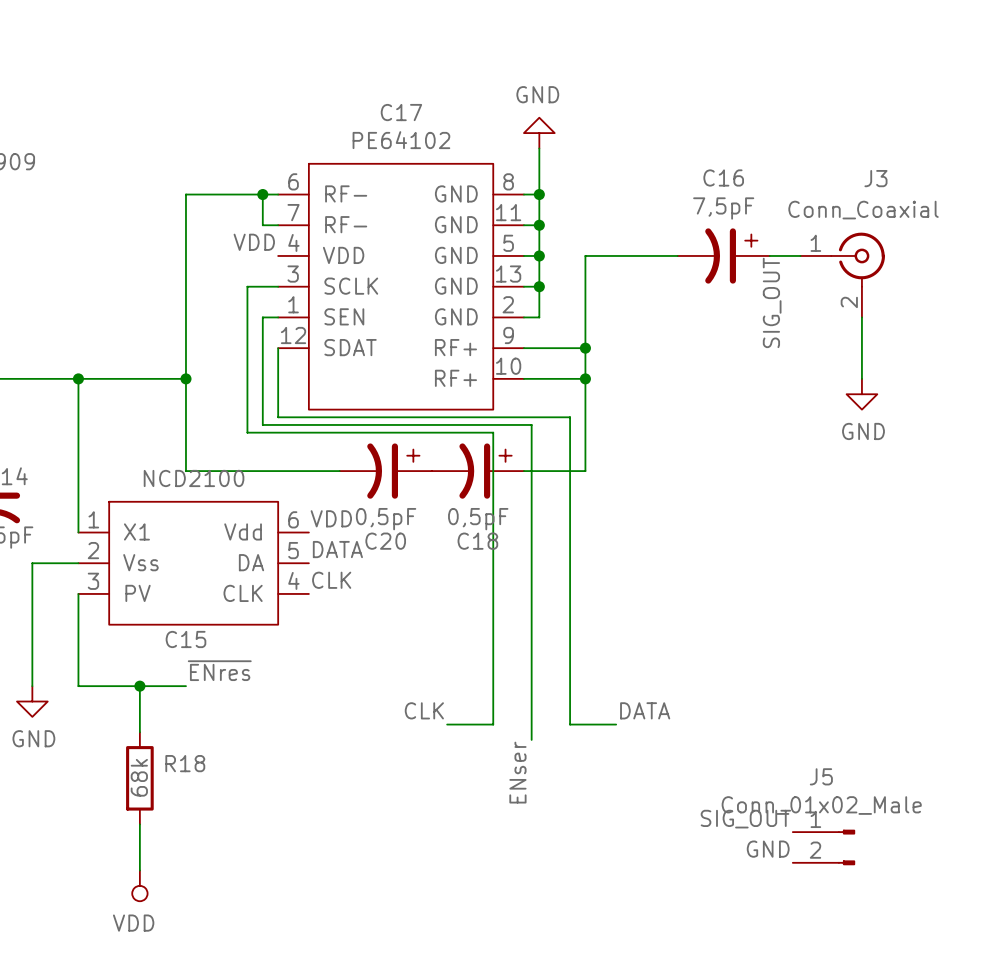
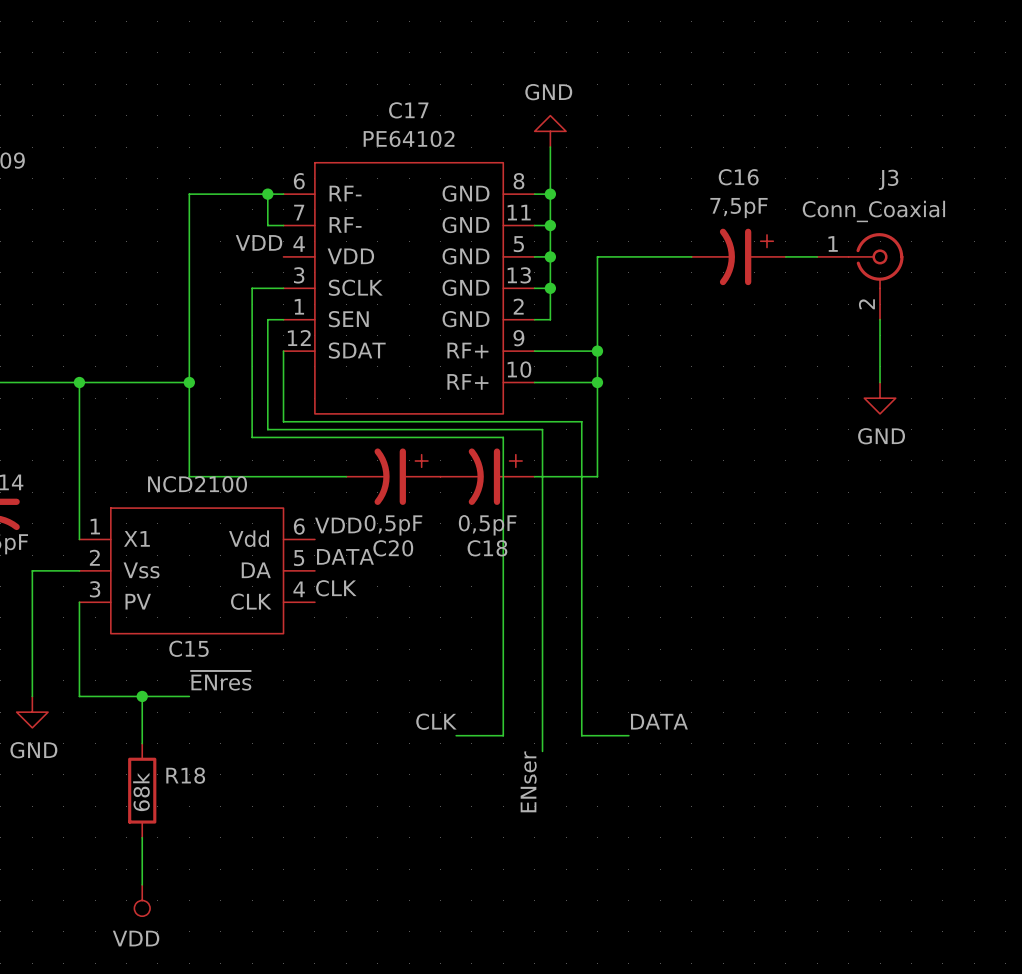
label: SIG_OUT (772, 302) -> none
label: SIG_OUT (745, 819) -> none
J5: Conn_01x02_Male (824, 847) -> none
label: GND (768, 849) -> none

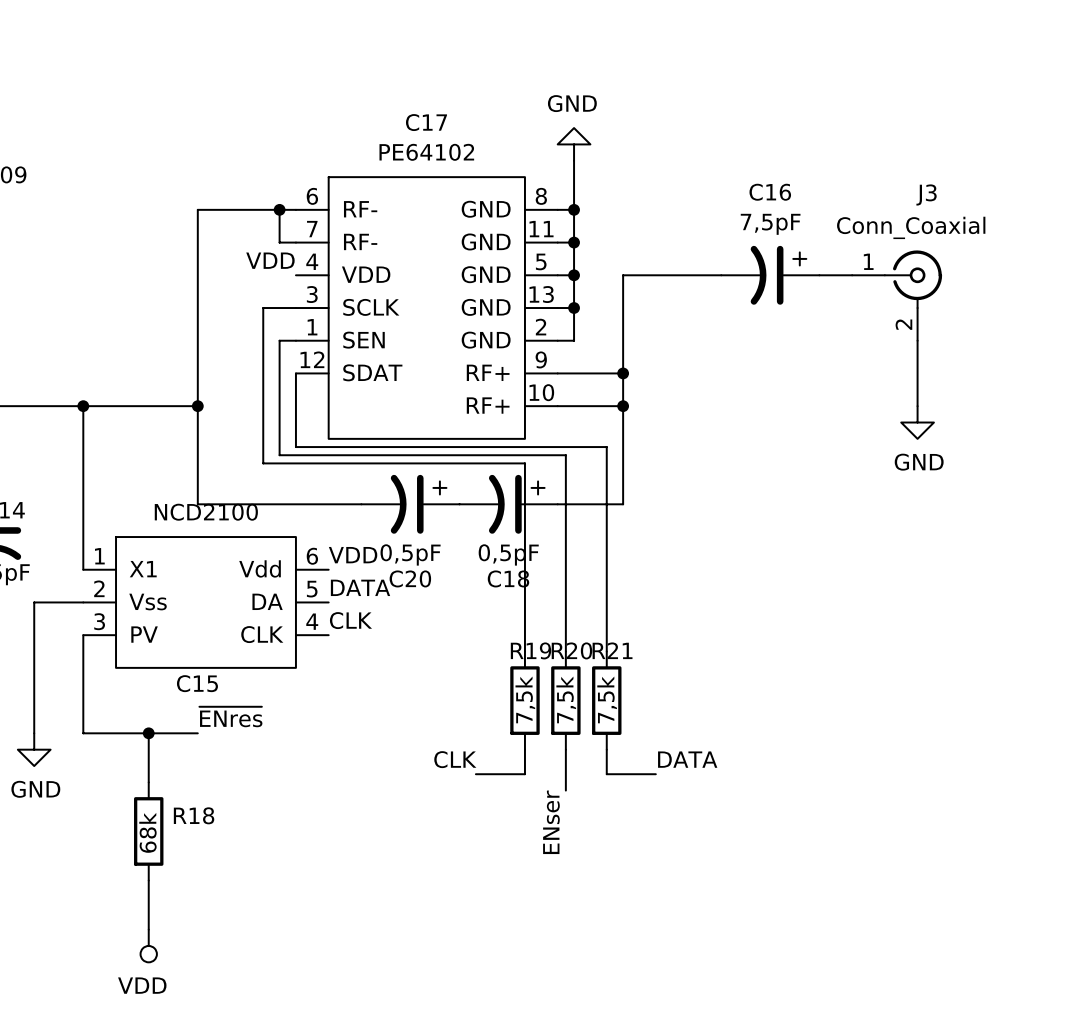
wire: (503, 617) (503, 712) -> none
wire: (542, 617) (542, 712) -> none
wire: (581, 617) (581, 712) -> none
R19: none -> 7,5k (524, 700)
R20: none -> 7,5k (565, 700)
R21: none -> 7,5k (606, 700)

